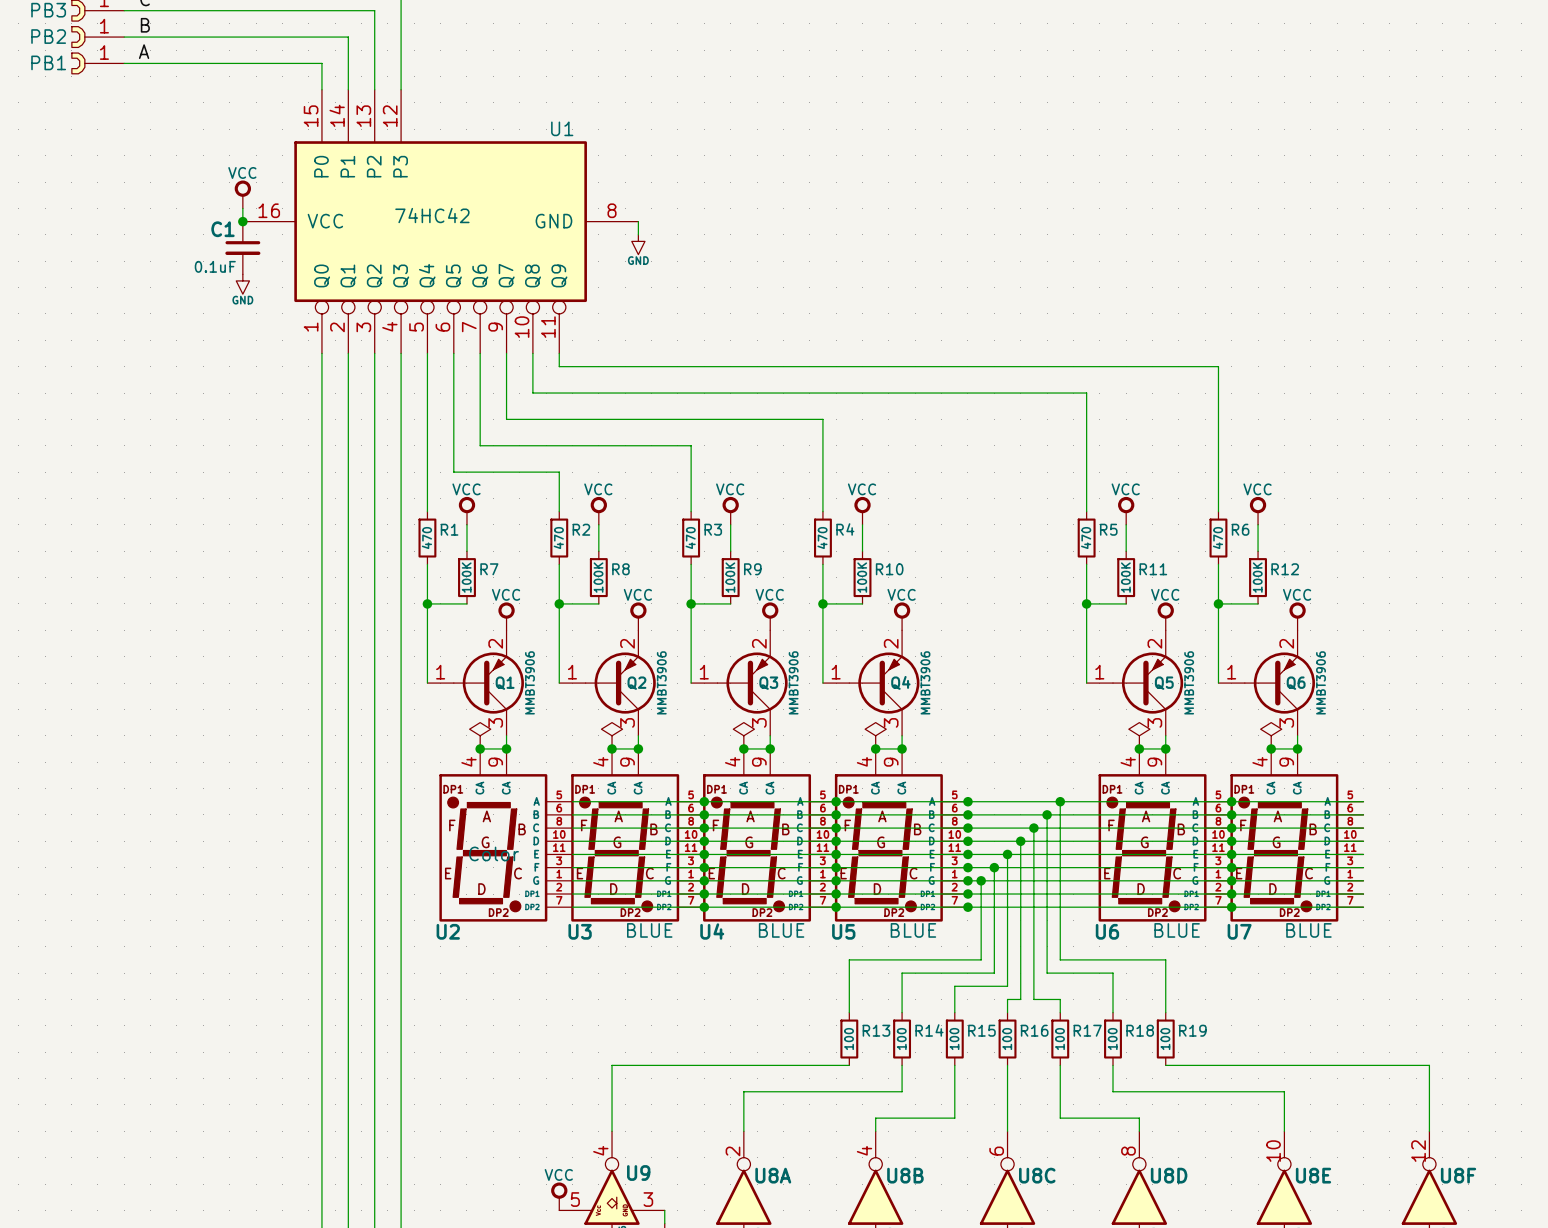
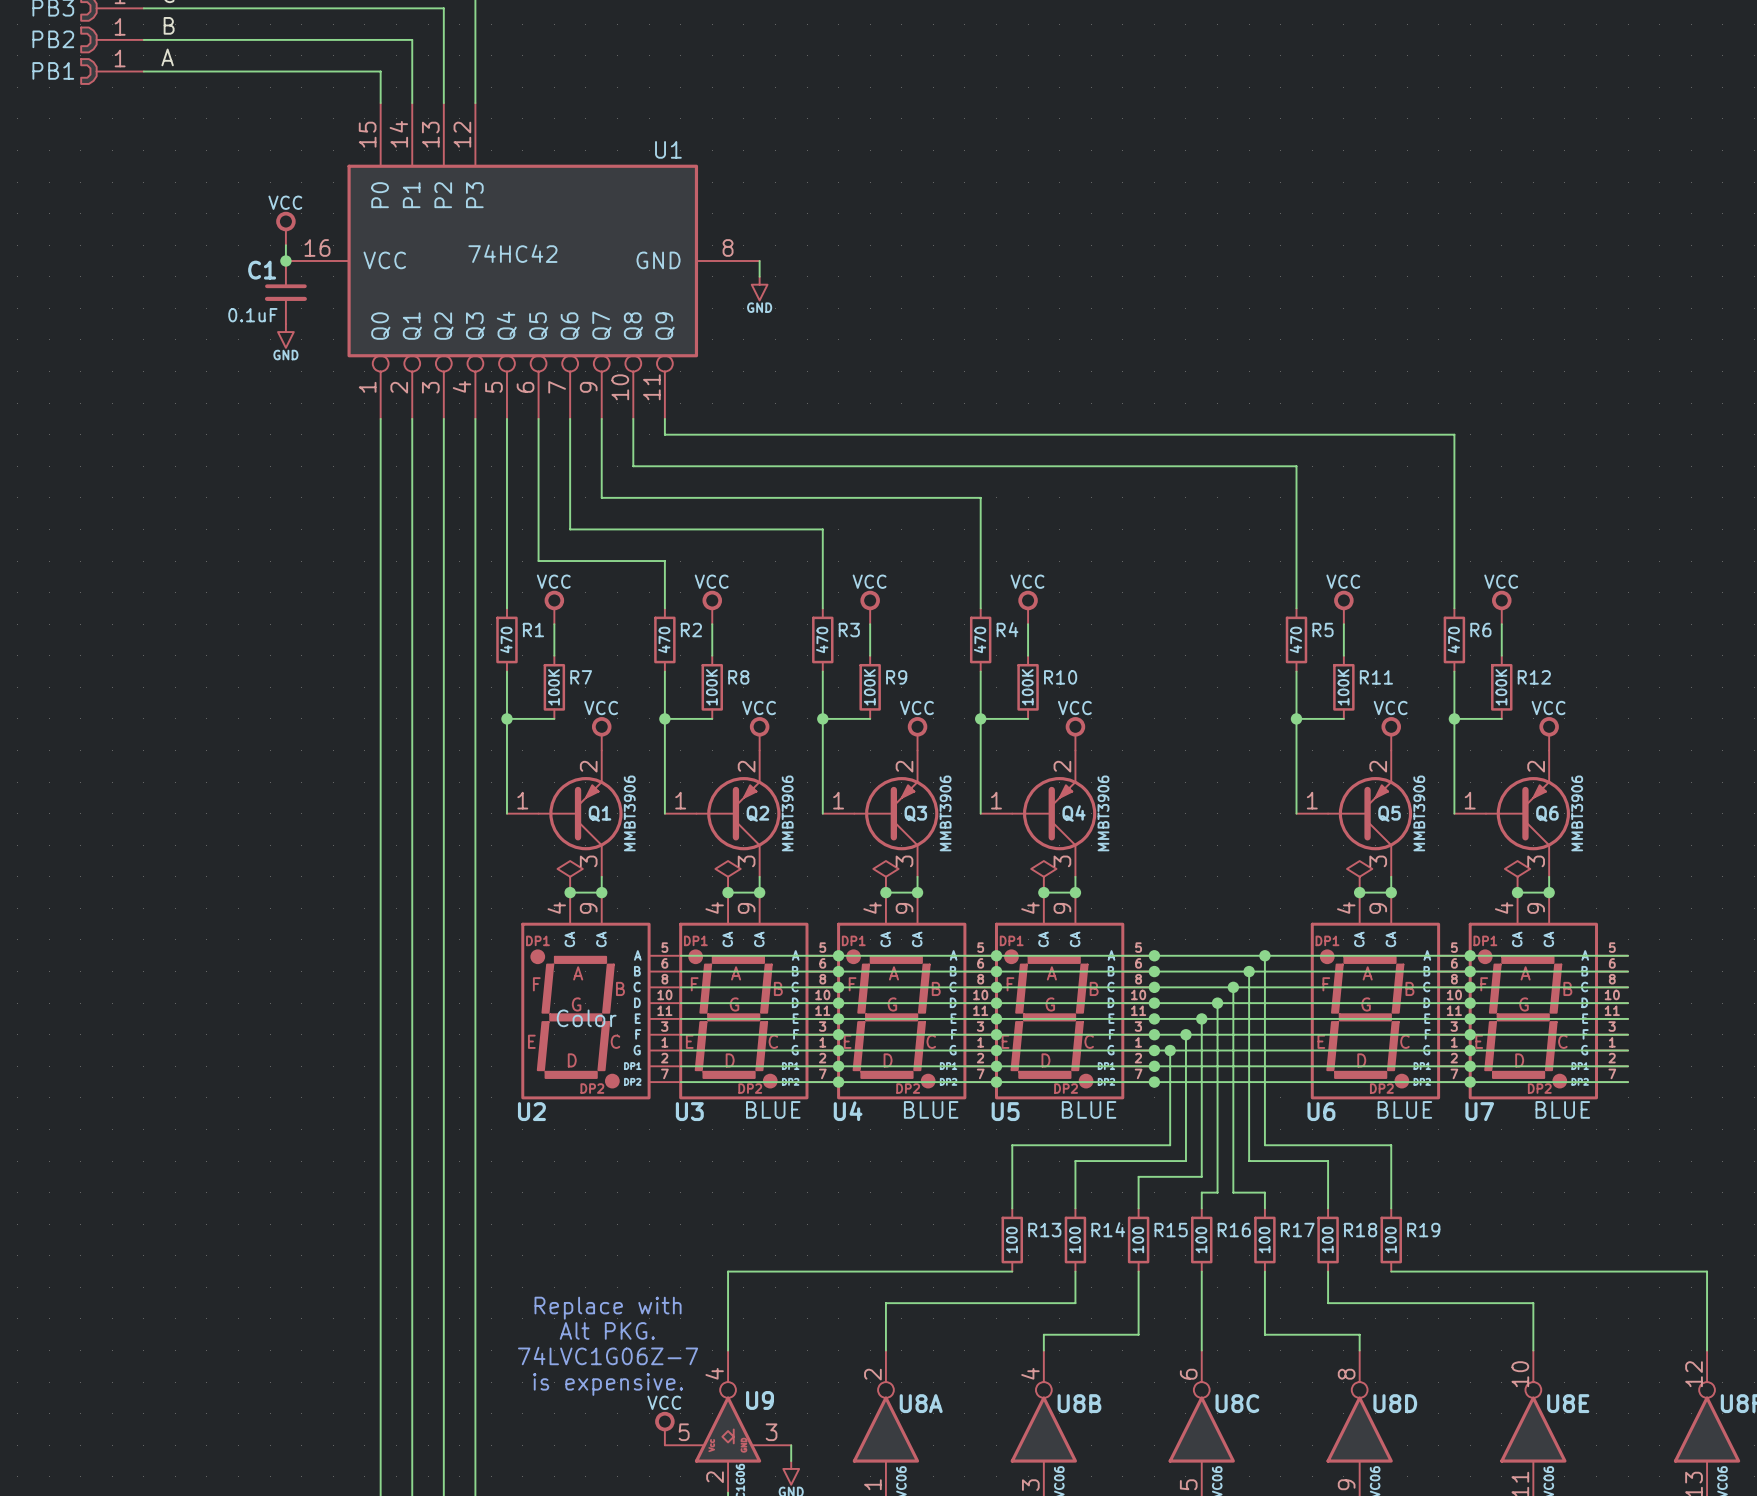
text: none -> Replace with (608, 1308)
text: none -> Alt PKG. (607, 1330)
text: none -> 74LVC1G06Z-7 (608, 1356)
text: none -> is expensive. (608, 1384)

